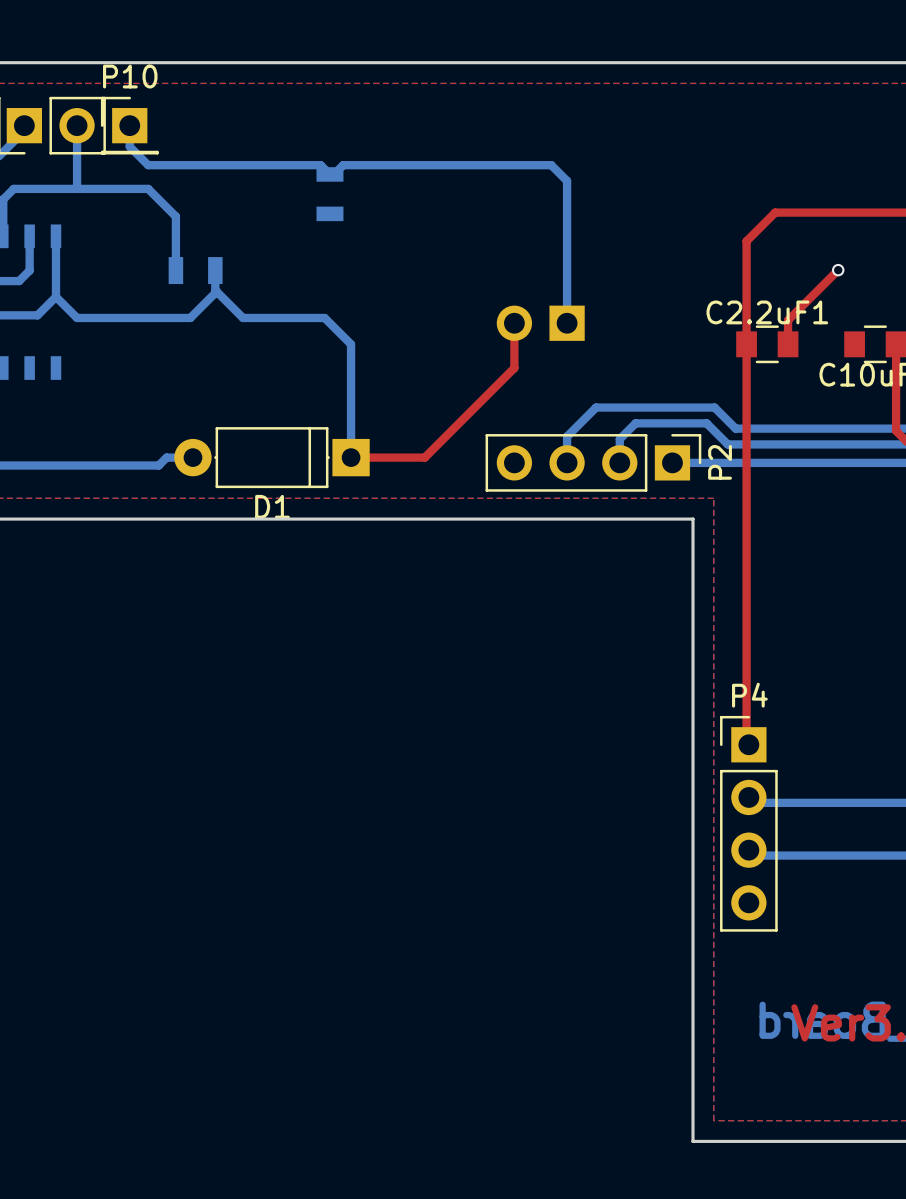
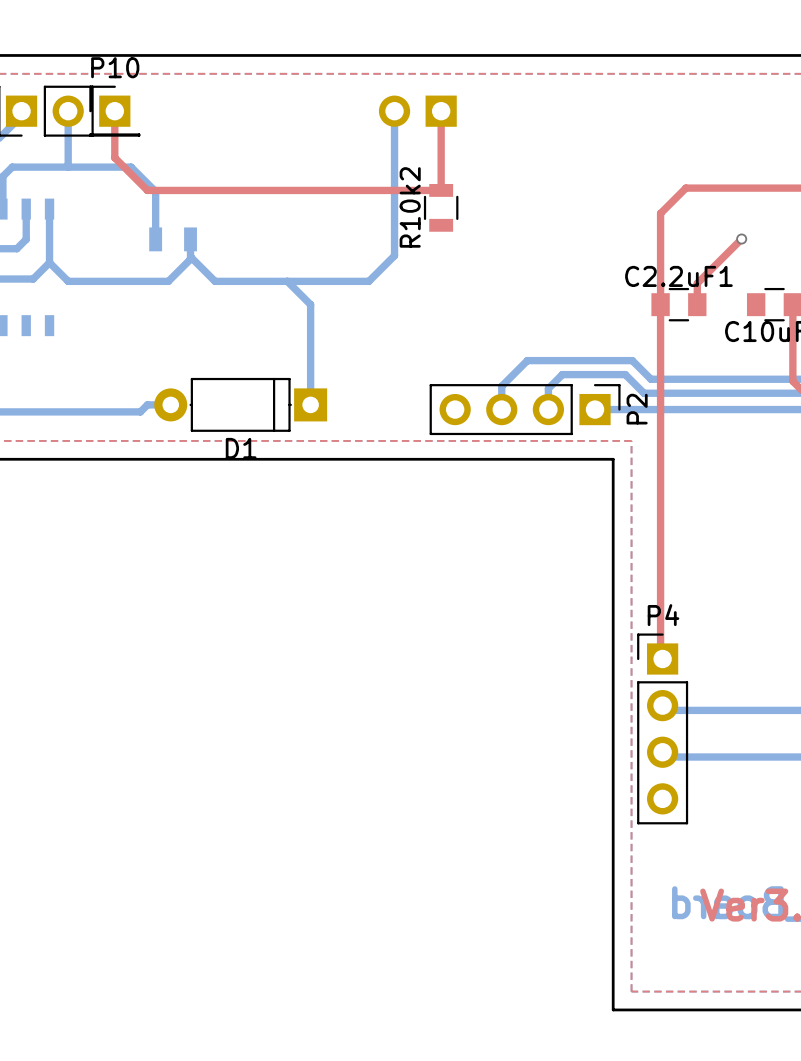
top track: none -> (114, 111) (114, 157) (147, 190) (441, 190) (441, 111)
bottom track: (129, 125) (129, 146) (148, 165) (320, 165) (329, 174) (333, 174) (343, 165) (551, 165) (567, 180) (567, 323) -> none
bottom track: none -> (394, 111) (394, 255) (368, 281) (287, 281)
R10k2 side: bottom (329, 194) -> top (441, 207)
top track: (514, 323) (514, 368) (424, 457) (351, 457) -> none
part position: (540, 323) -> (417, 111)

